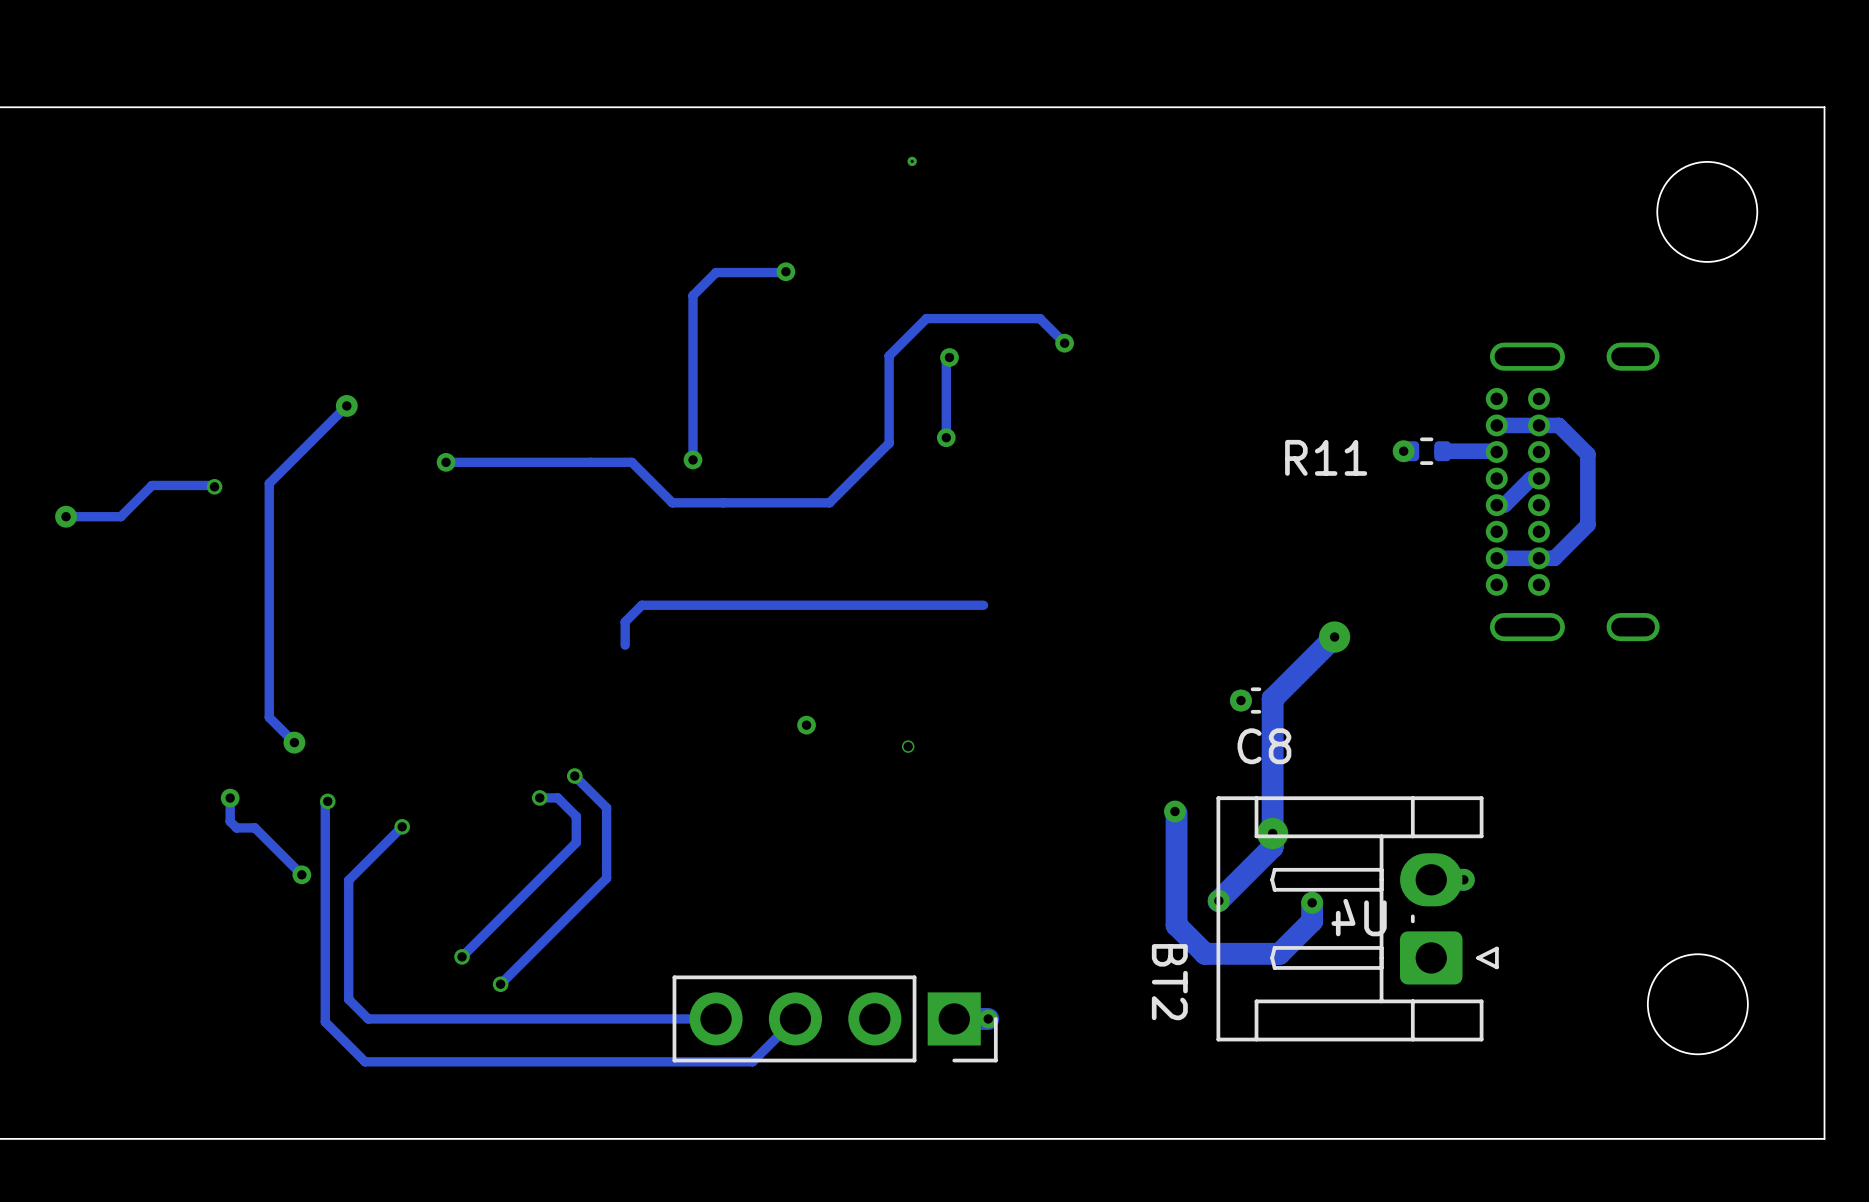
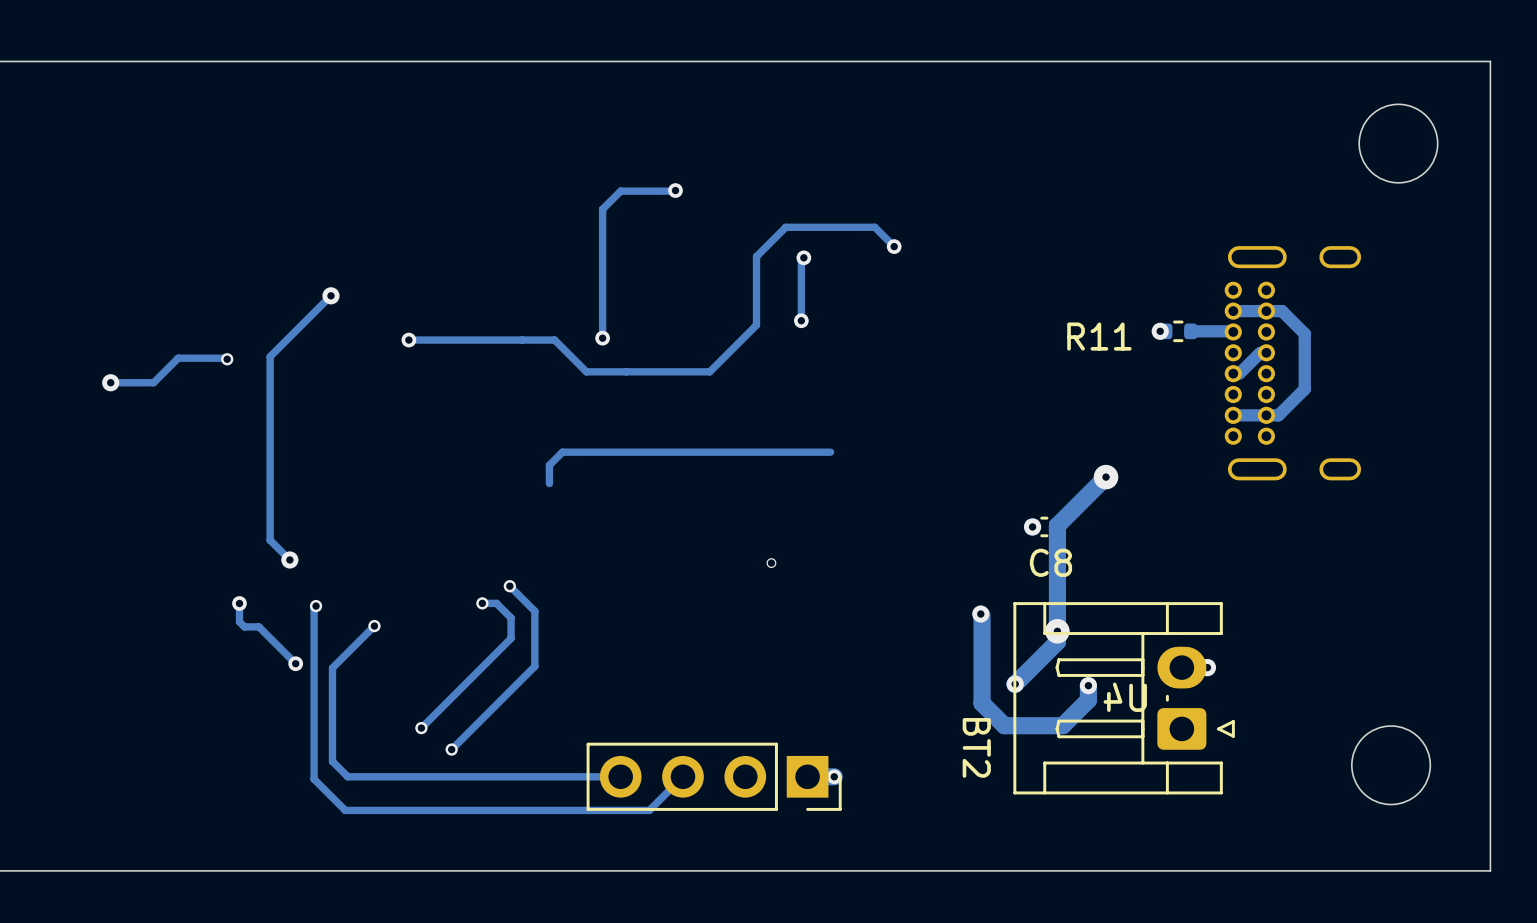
via: (912, 161) -> none
via: (806, 725) -> none

